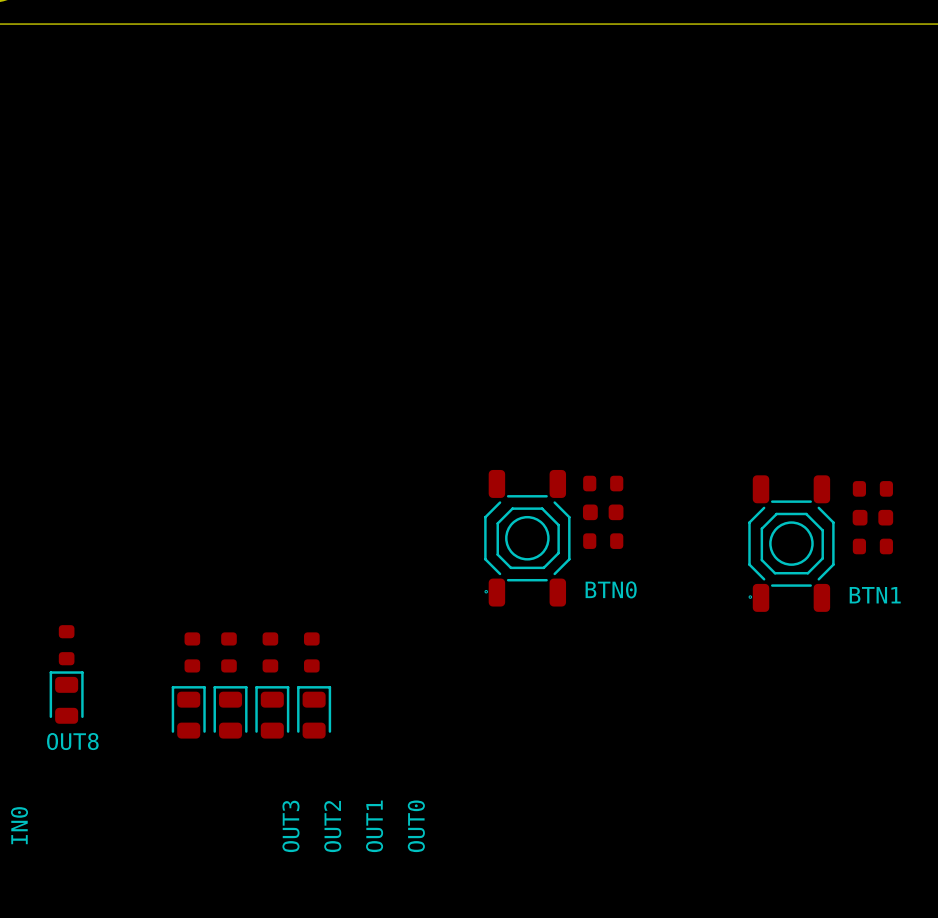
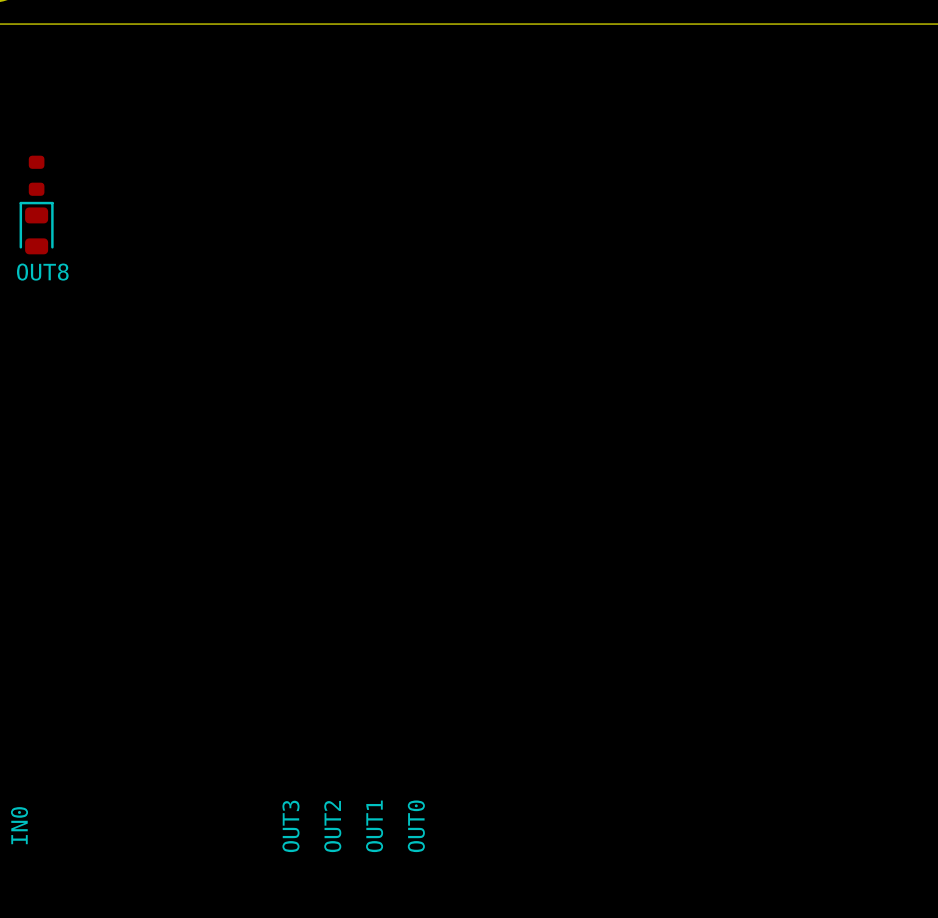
part: none -> (36, 175)
part: none -> (36, 228)
text: none -> OUT8 (42, 272)
part: (603, 483) -> none
part: (872, 488) -> none
part: (603, 512) -> none
part: (872, 517) -> none
part: (527, 538) -> none
part: (603, 541) -> none
part: (791, 543) -> none
part: (872, 546) -> none
text: BTN0 (611, 589) -> none
text: BTN1 (875, 595) -> none
part: (66, 645) -> none
part: (192, 652) -> none
part: (228, 652) -> none
part: (270, 652) -> none
part: (311, 652) -> none
part: (66, 697) -> none
part: (188, 712) -> none
part: (230, 712) -> none
part: (272, 712) -> none
part: (314, 712) -> none
text: OUT8 (72, 741) -> none

